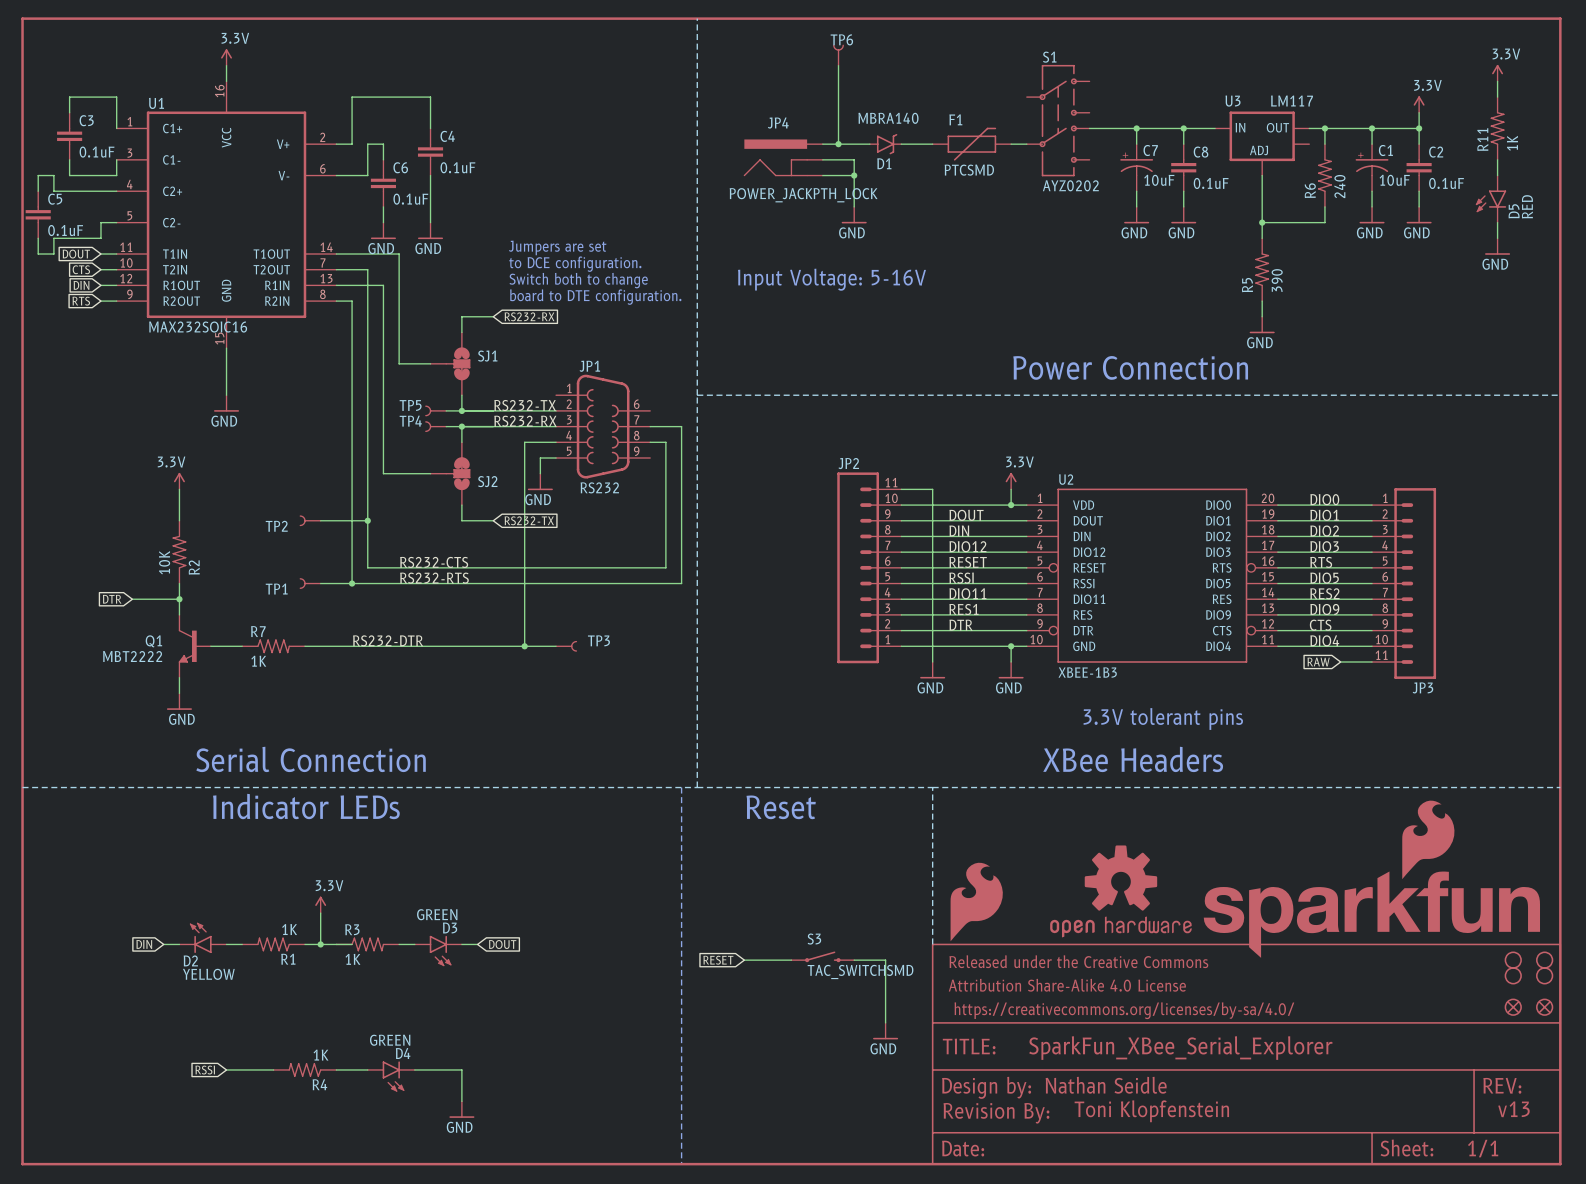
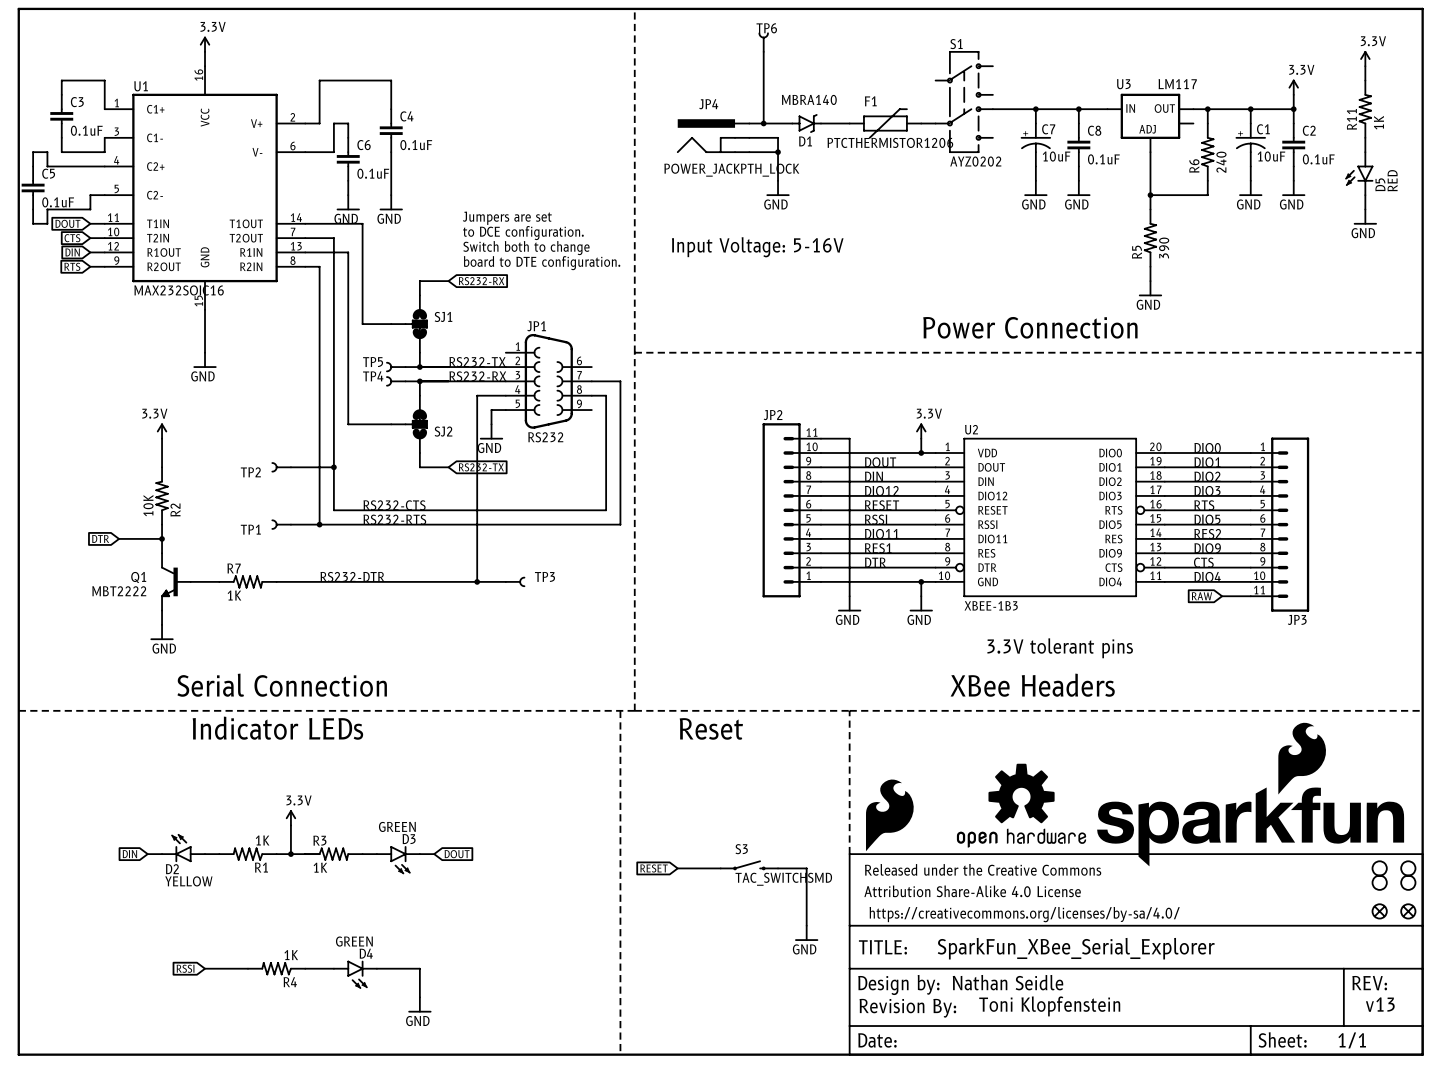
F1 value: PTCSMD (969, 170) -> PTCTHERMISTOR1206 (890, 142)

